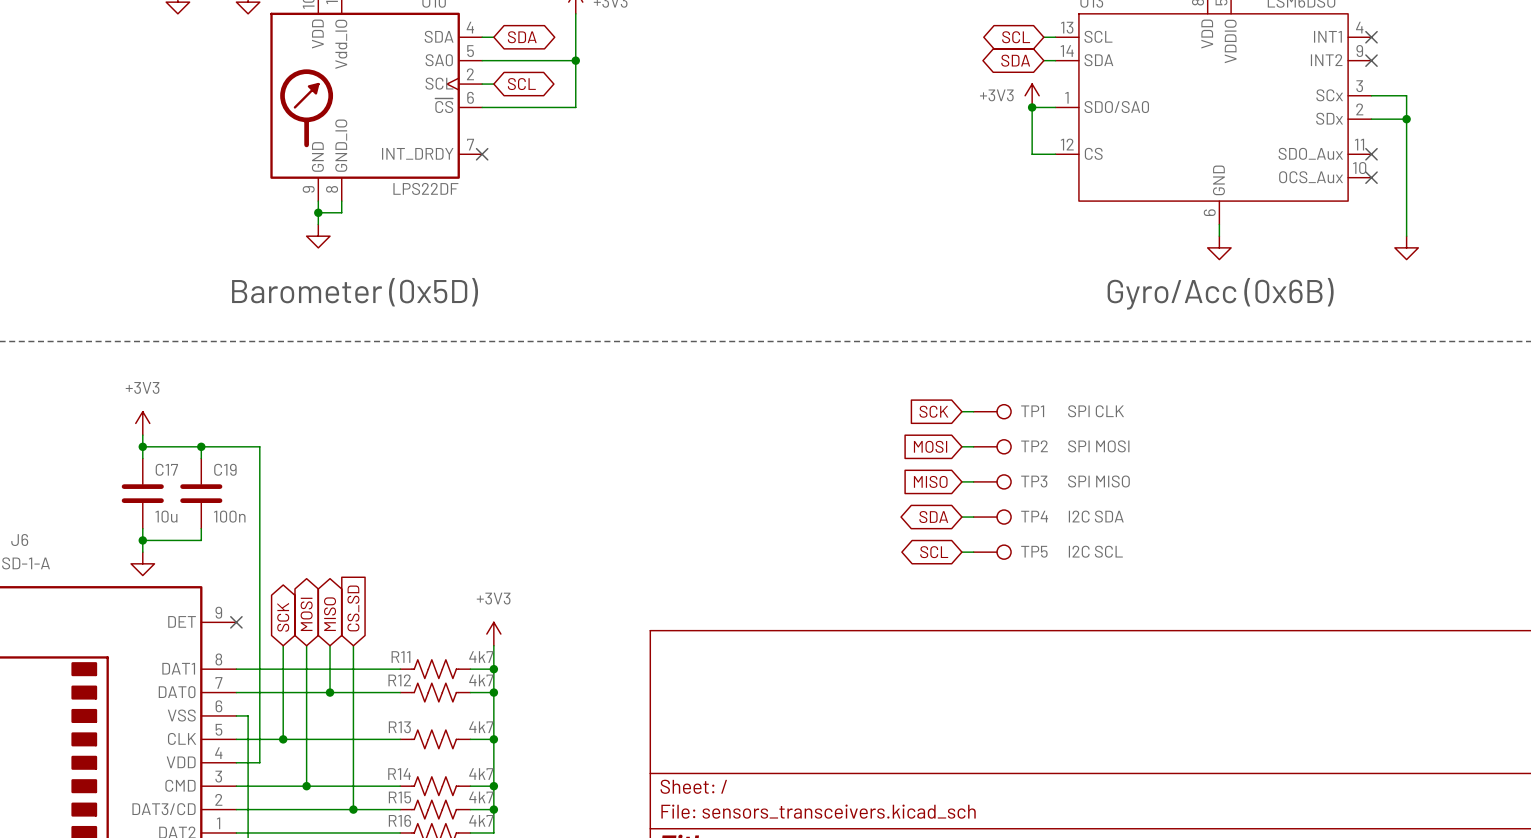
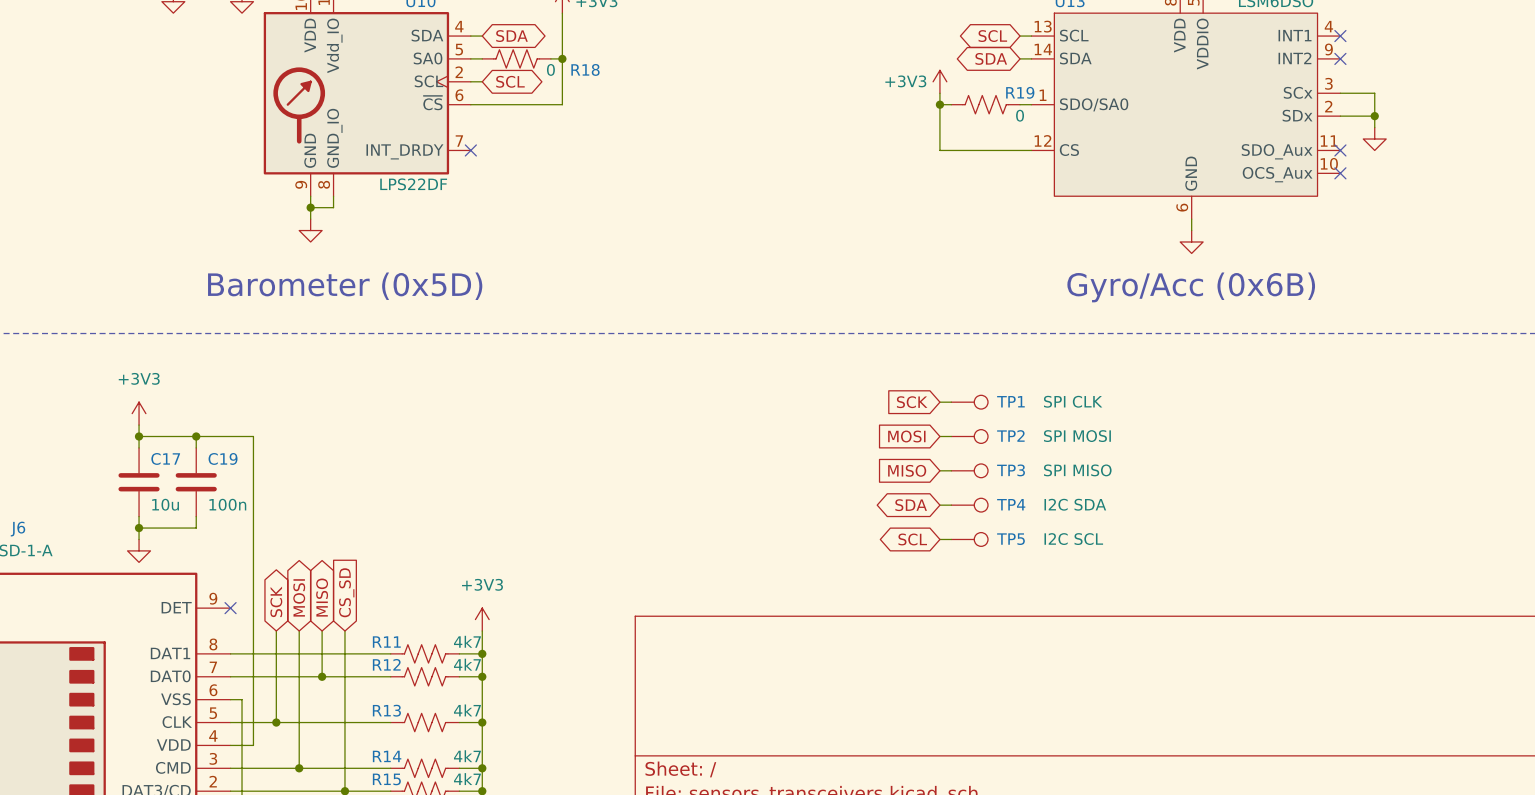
R18: none -> 0 (516, 58)
power symbol position: +3V3 (1032, 95) -> +3V3 (939, 81)
wire: none -> (939, 104) (951, 104)
junction: none -> (939, 104)
R19: none -> 0 (985, 104)
junction: (1032, 107) -> none
wire: (1043, 107) (1032, 107) (1032, 154) -> (939, 93) (939, 150) (1008, 150)
wire: (1406, 130) (1406, 236) -> none
power symbol position: (1406, 247) -> (1374, 139)

